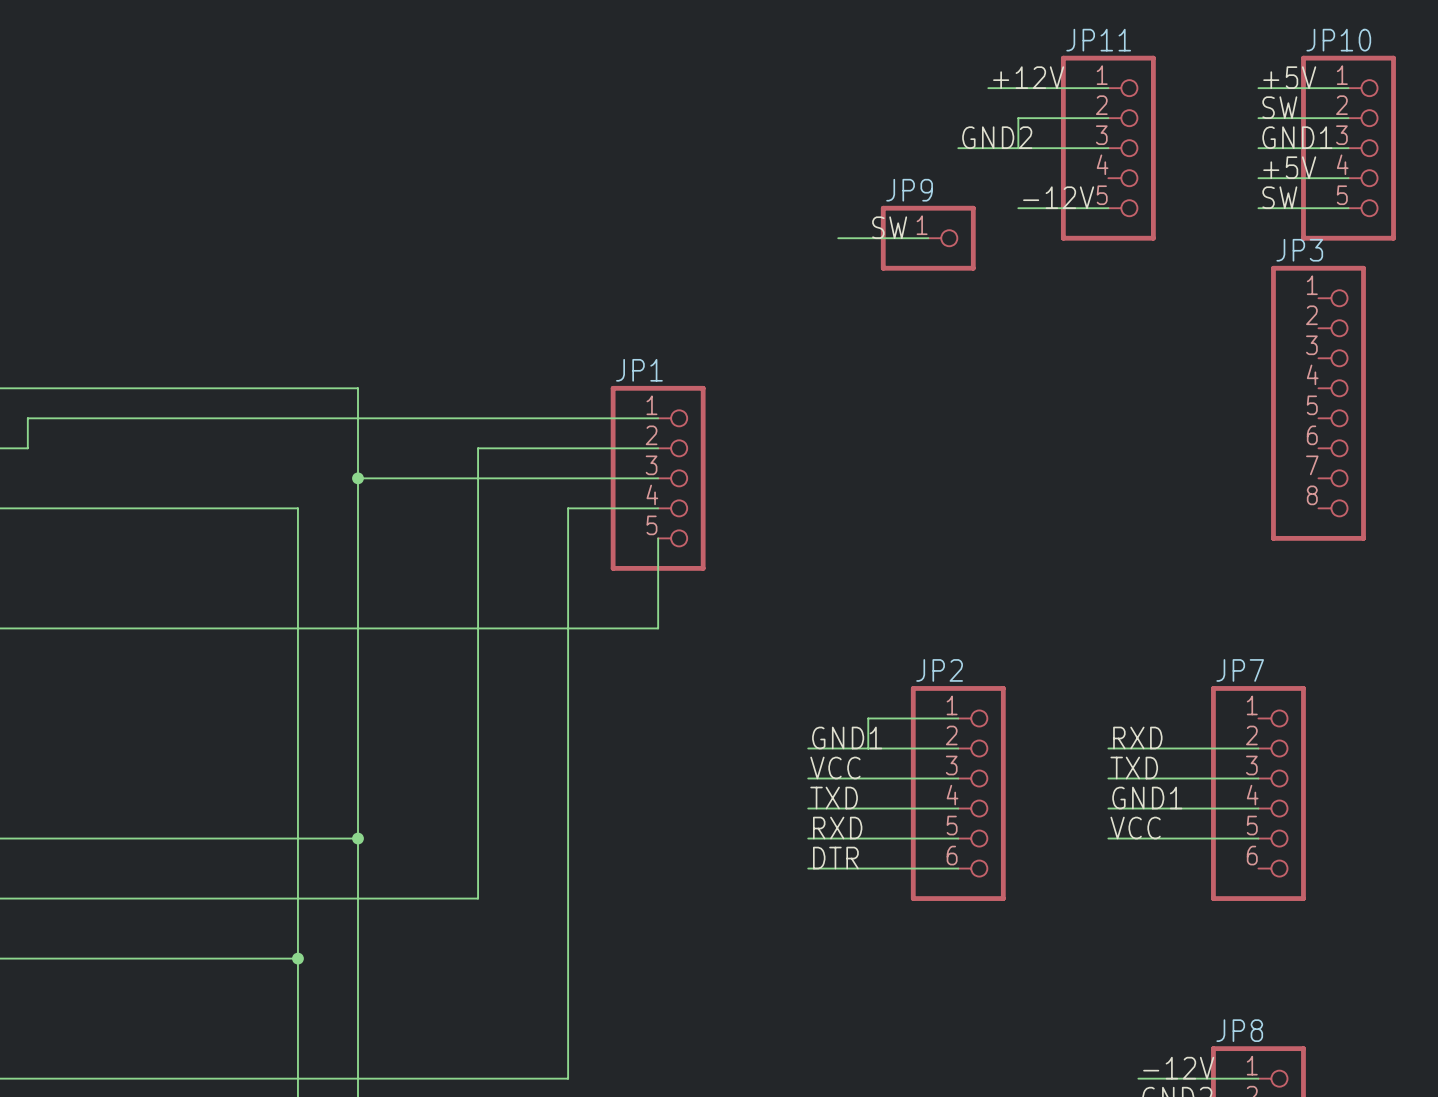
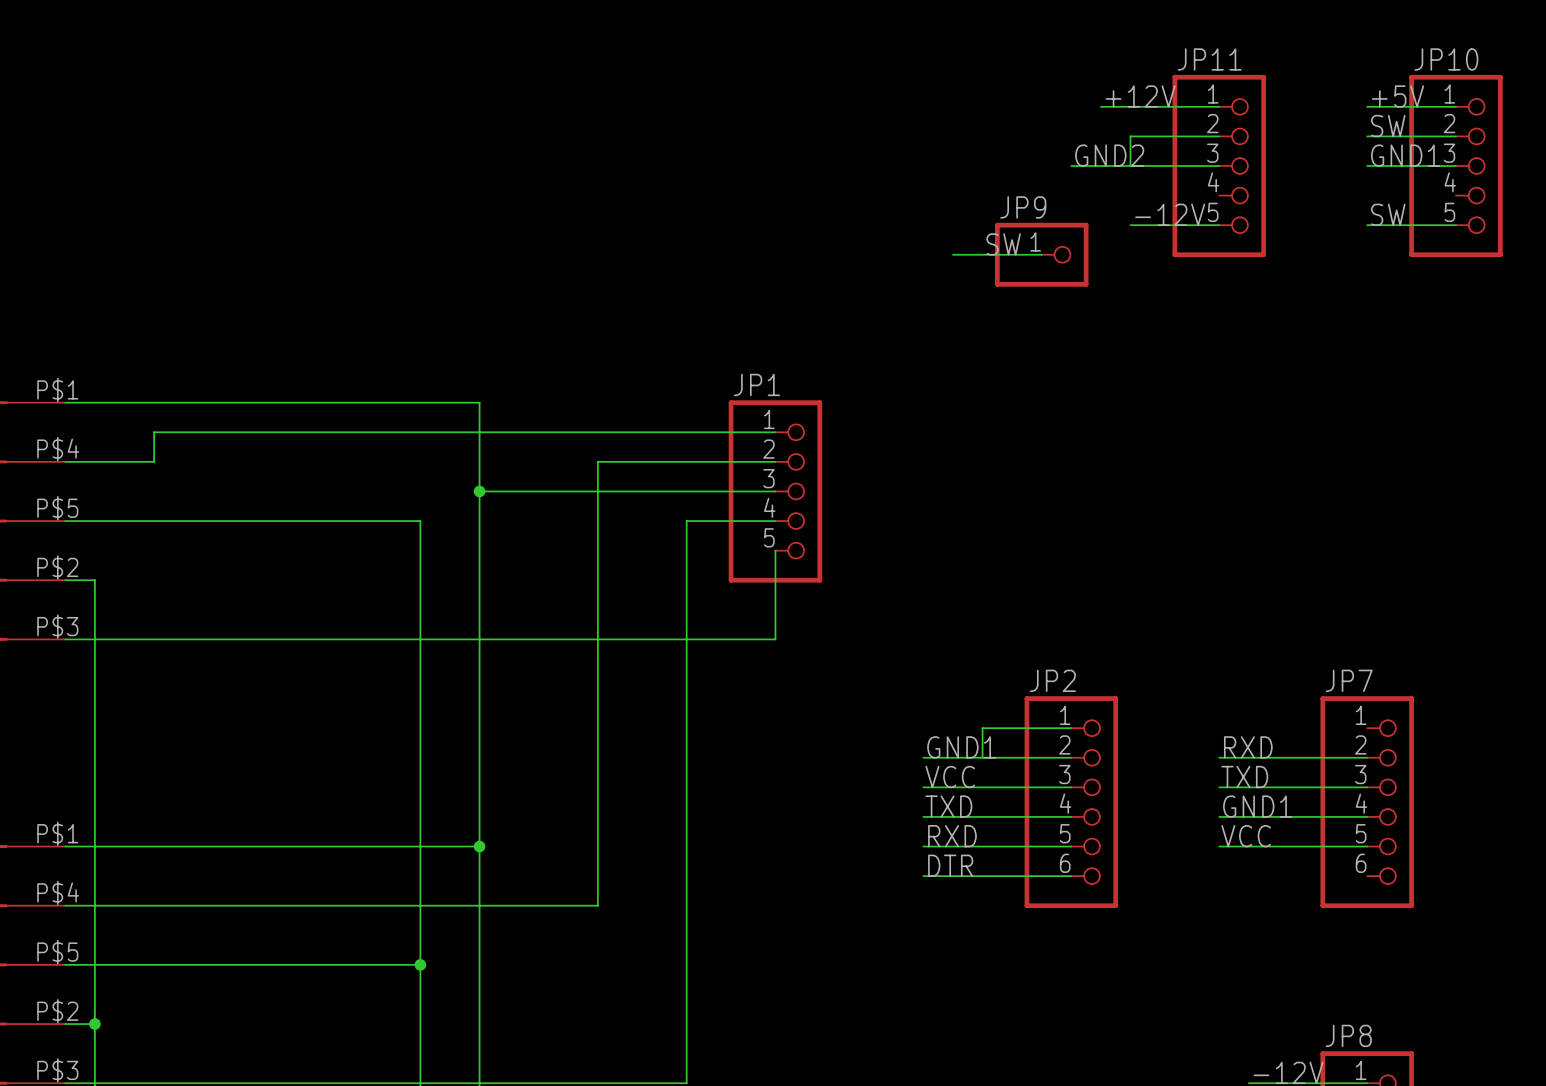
label: +5V (1289, 167) -> none
wire: (1258, 178) (1348, 178) -> none
JP3: (1318, 403) -> none

